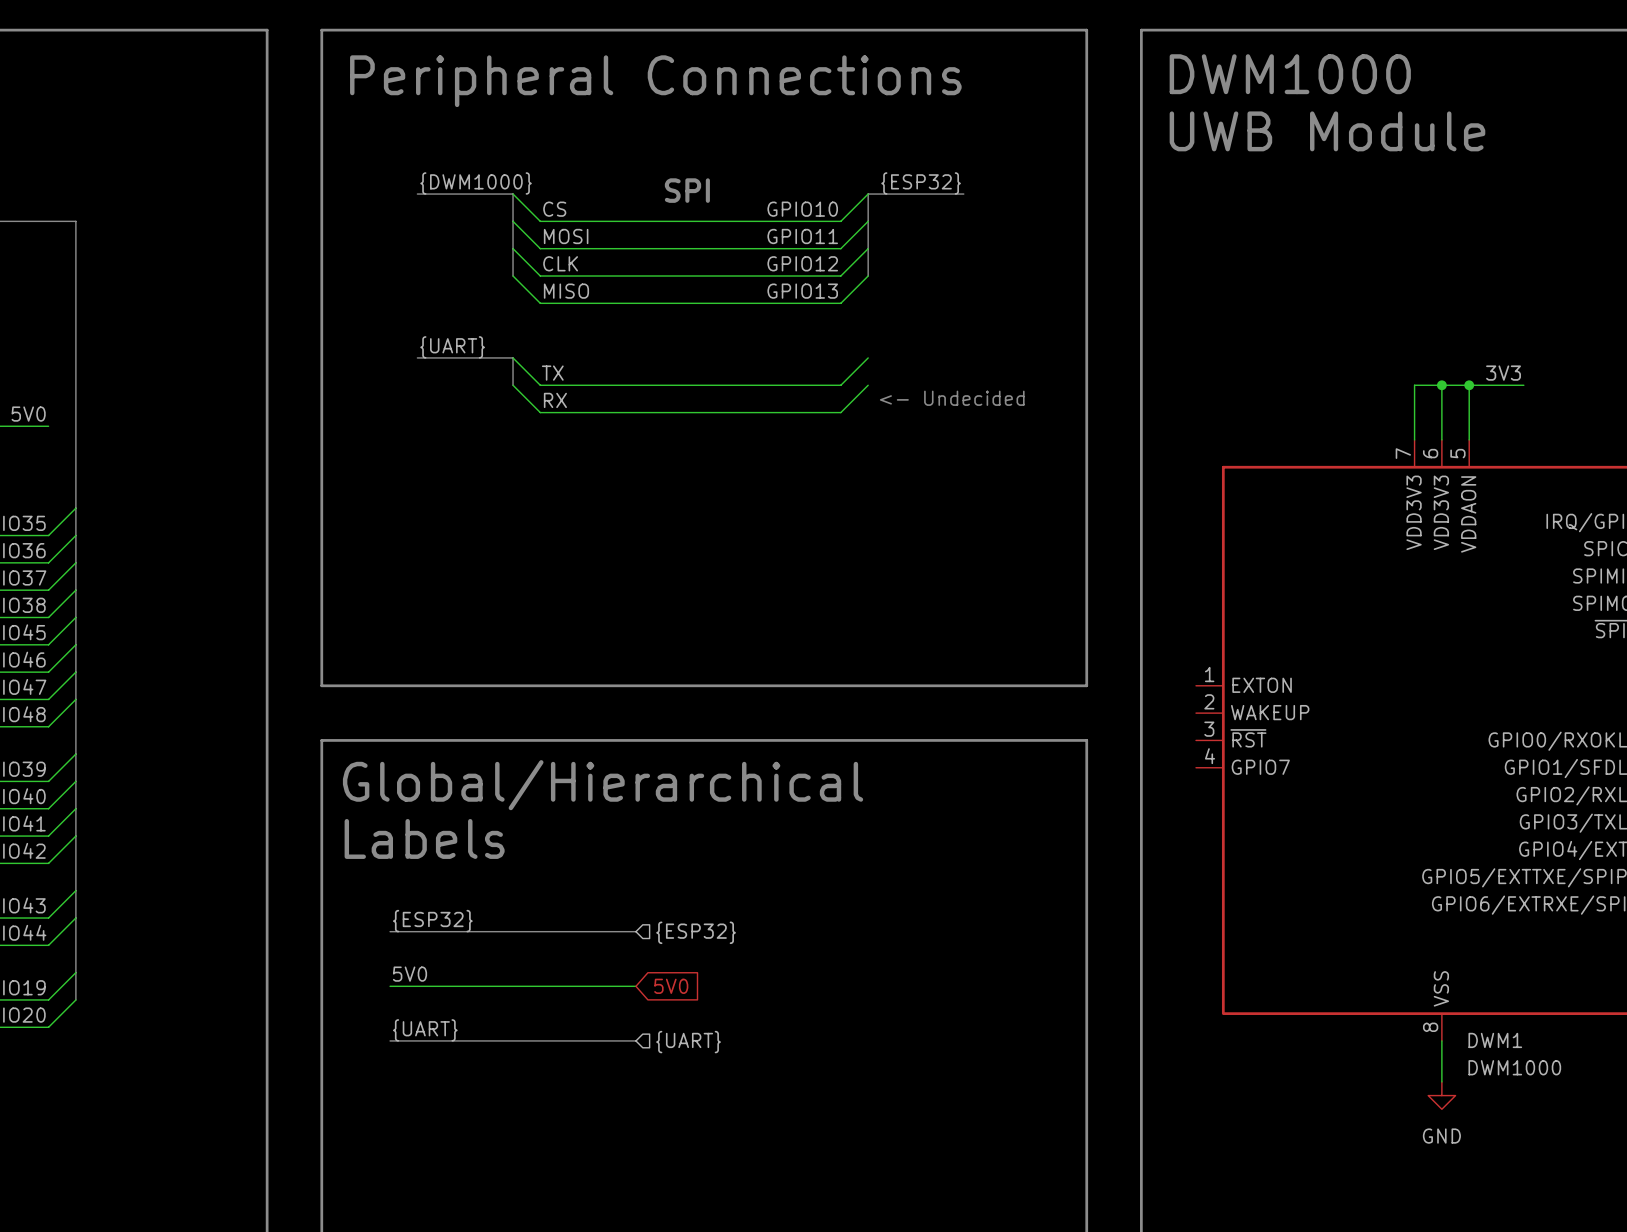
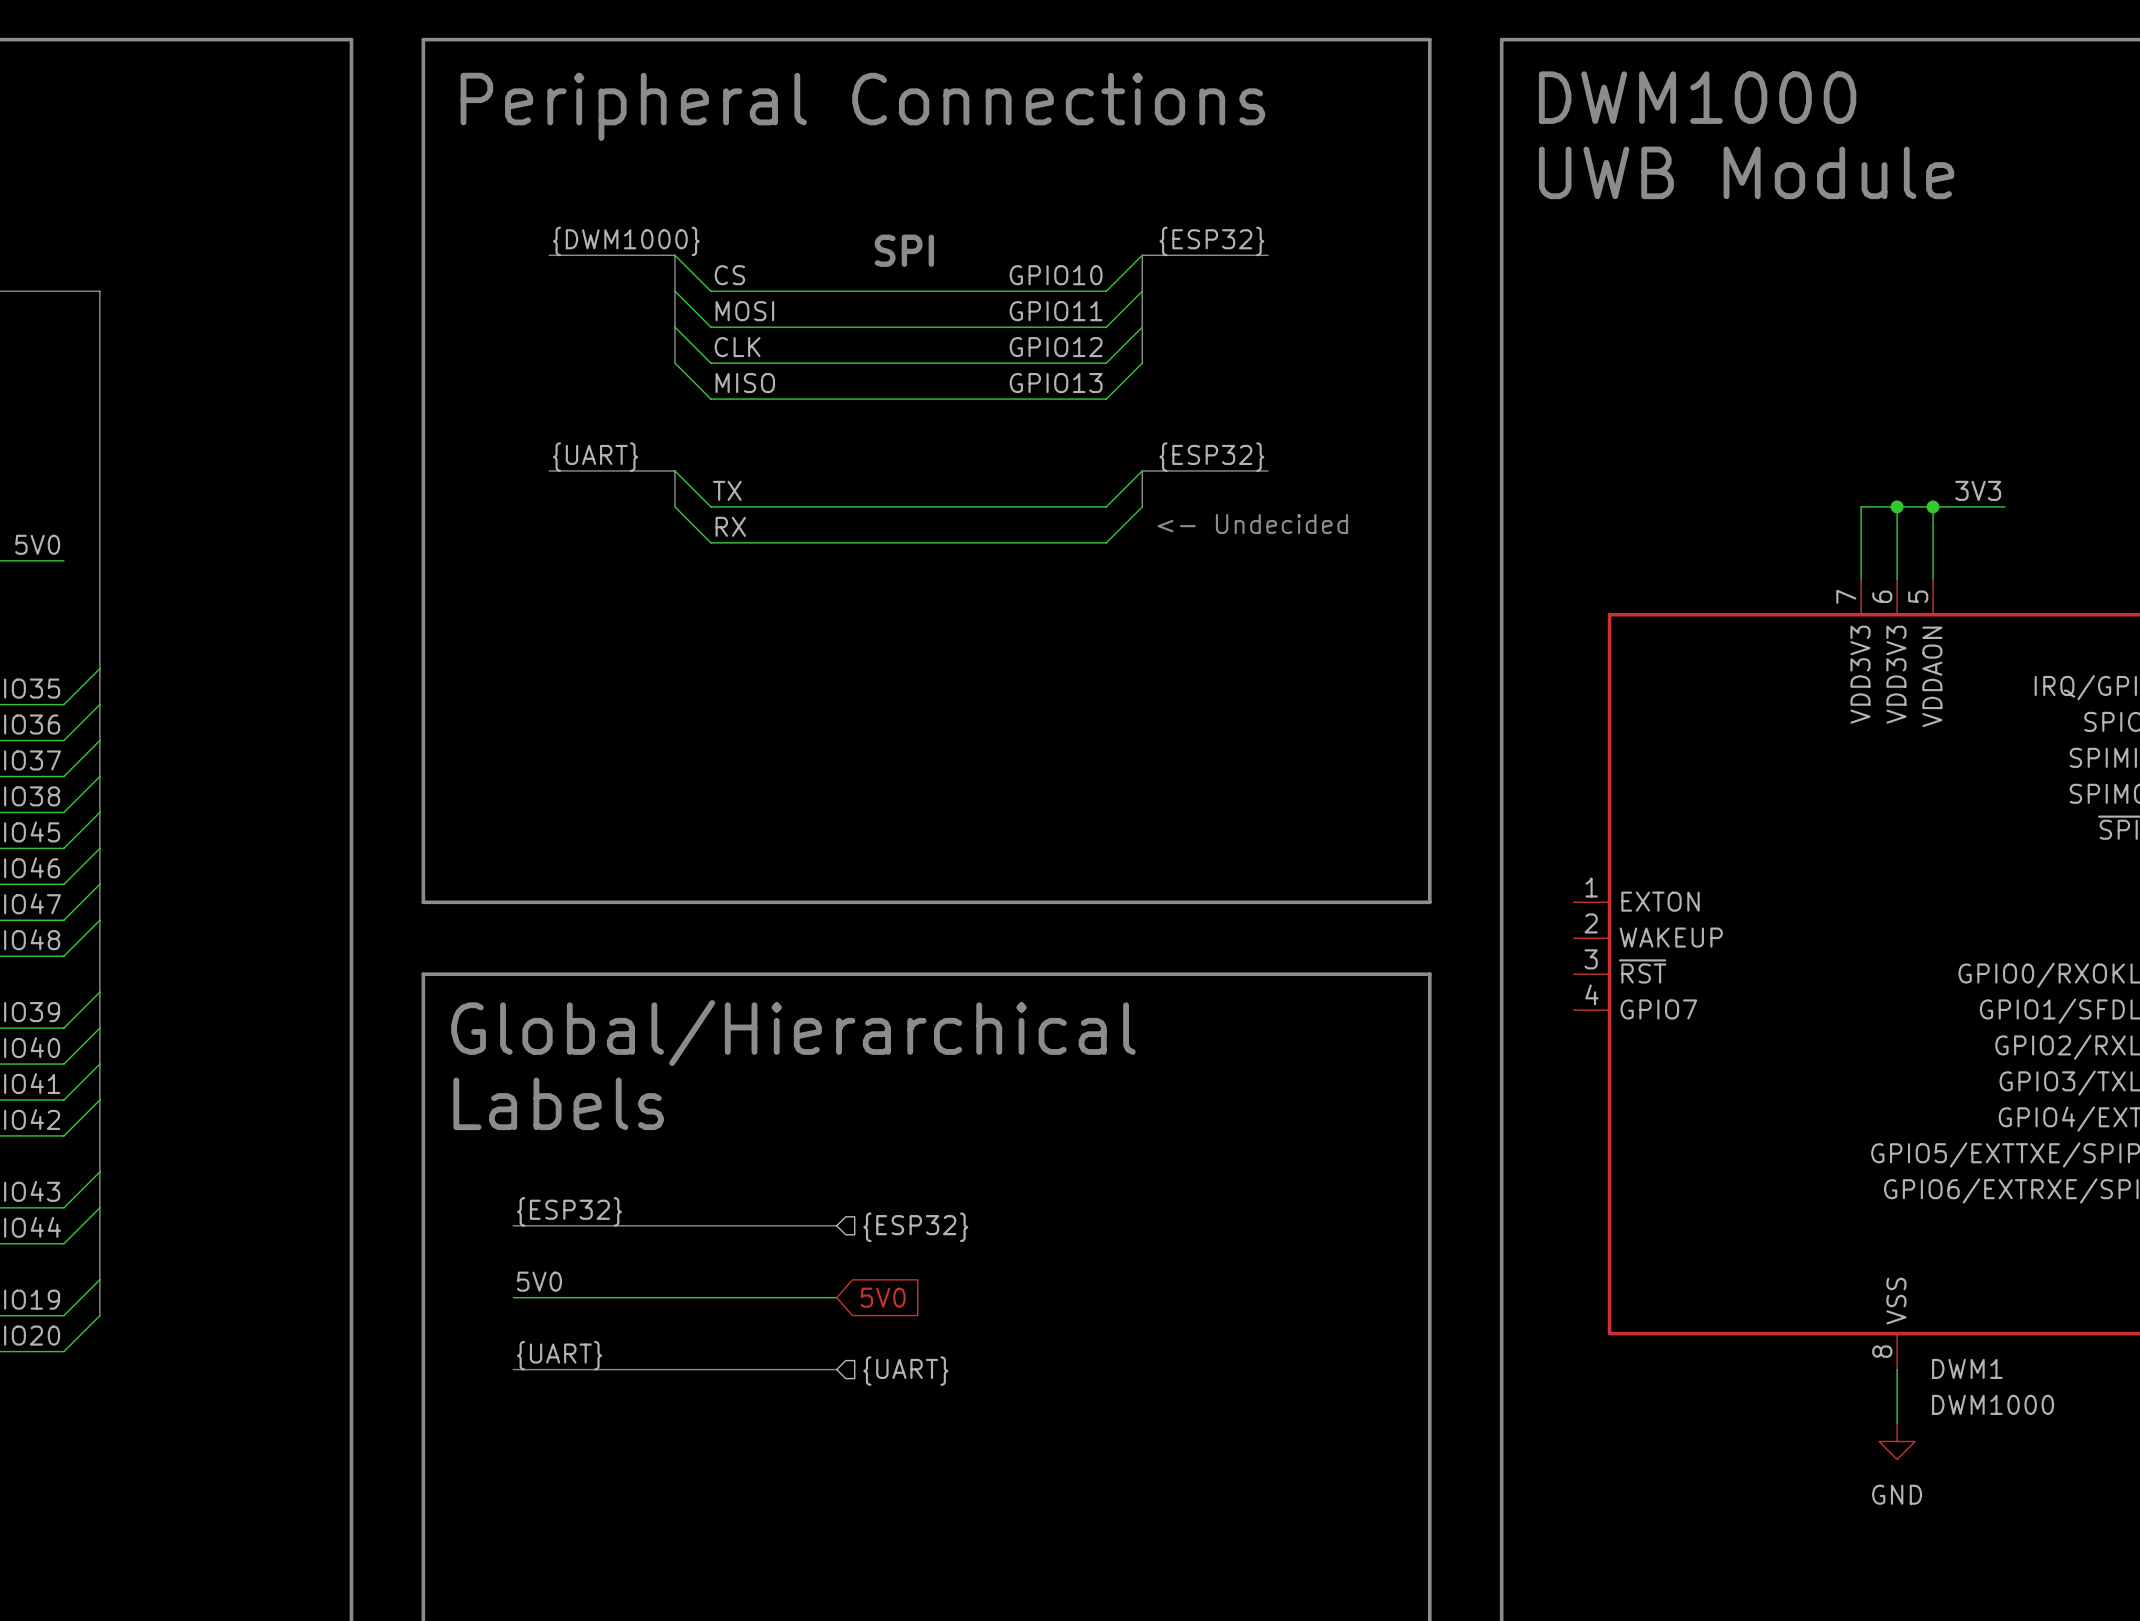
label: none -> {ESP32} (1211, 457)
bus: none -> (1268, 470) (1142, 470) (1142, 506)

